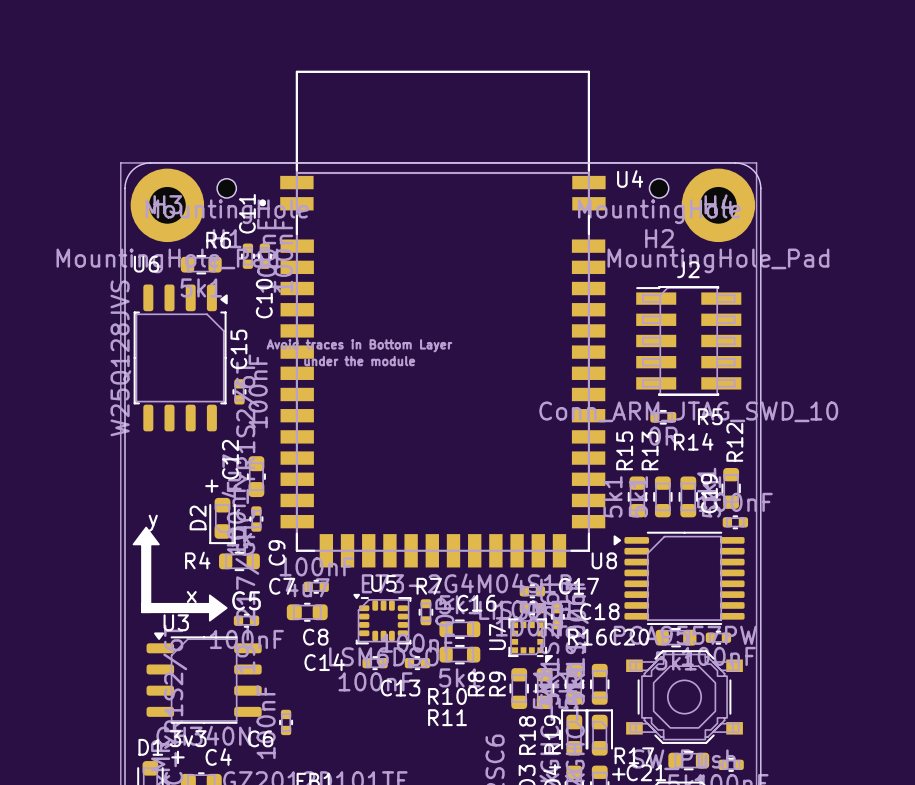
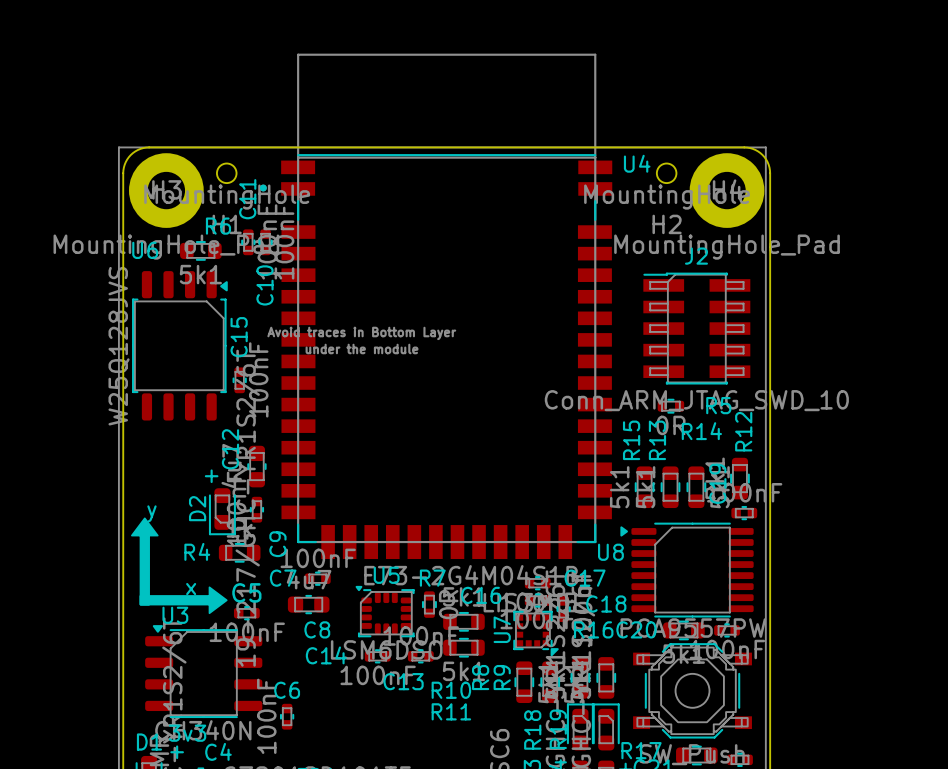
U4 footprint: [259, 70, 606, 568] -> [259, 53, 613, 560]
C6 name position: C6 (260, 738) -> C6 (287, 690)

